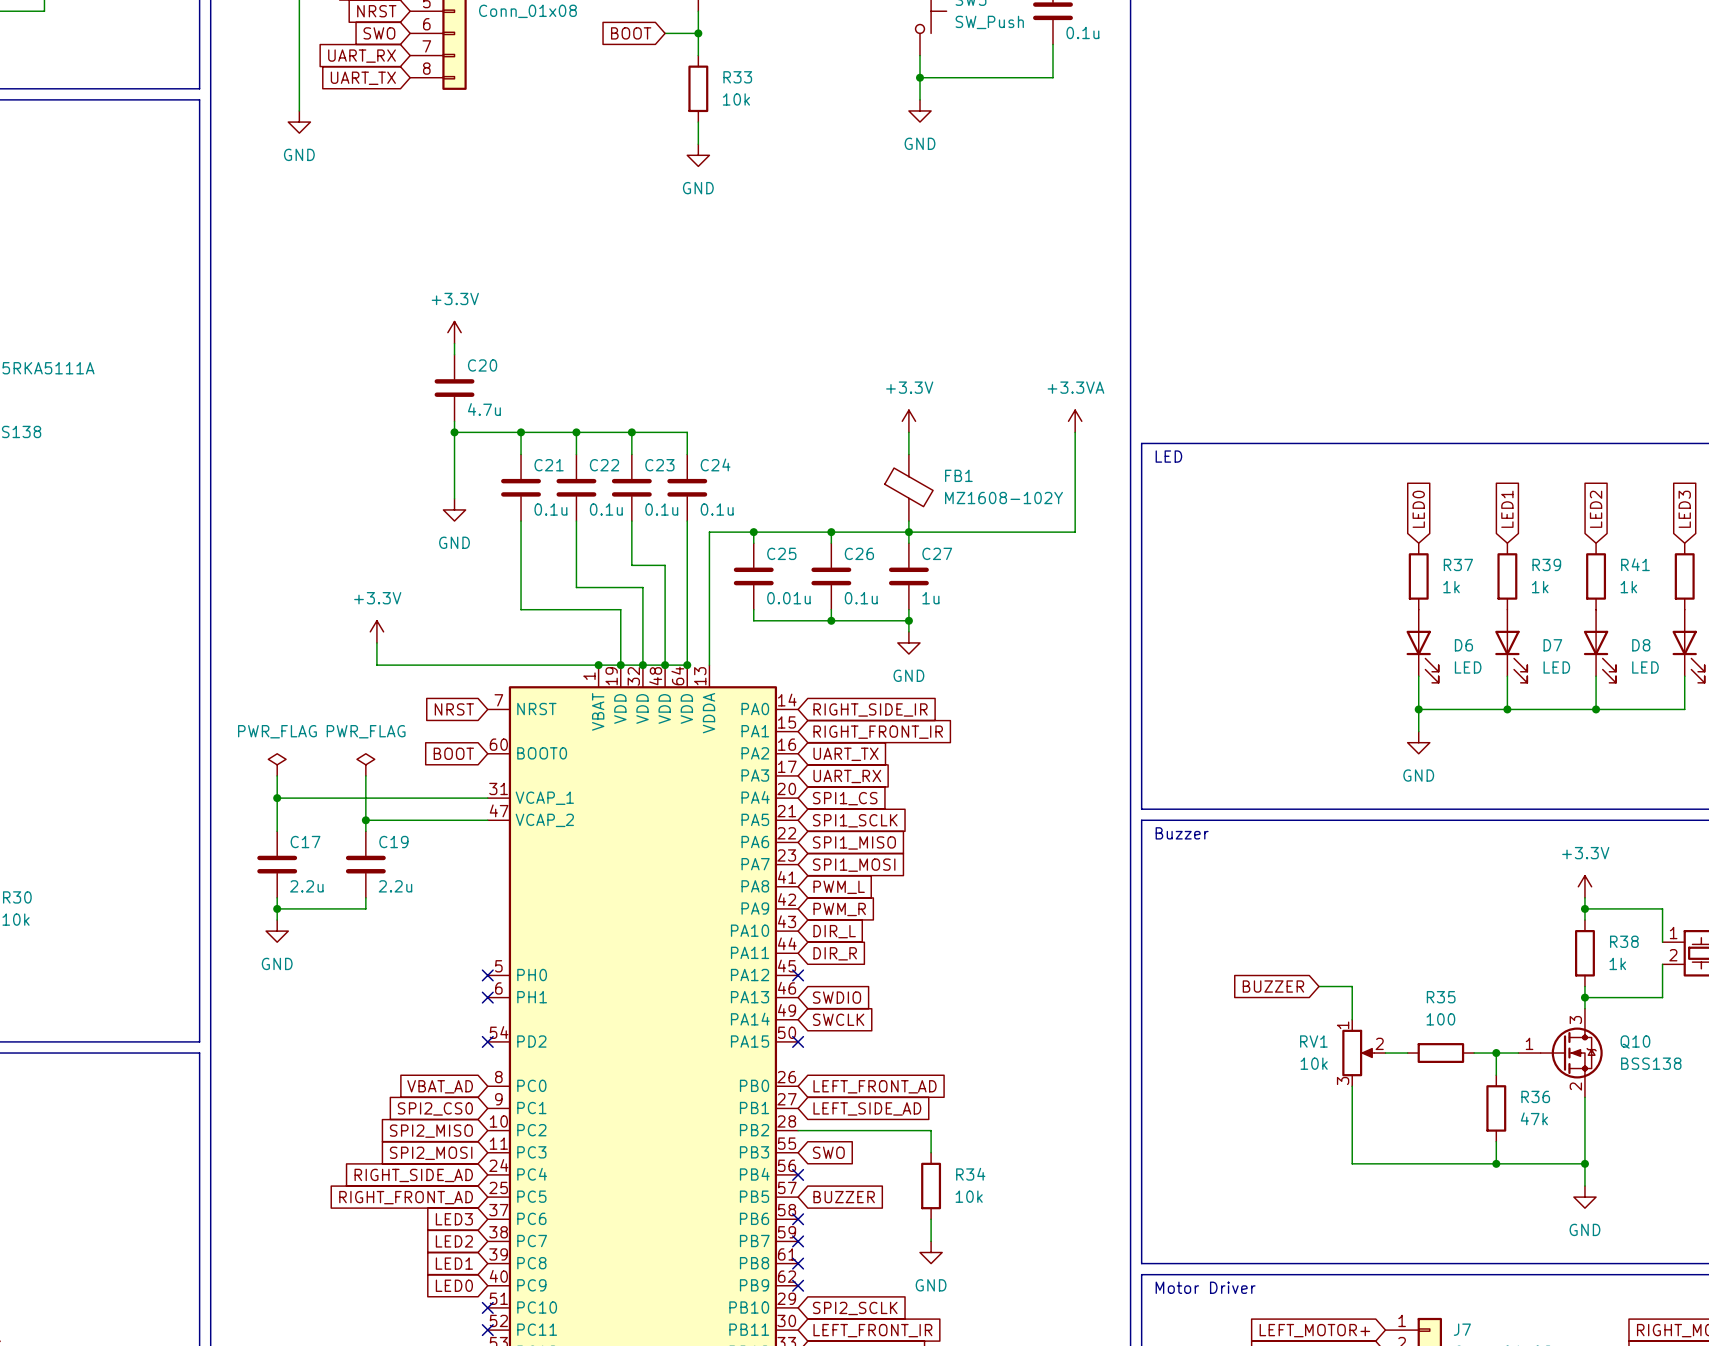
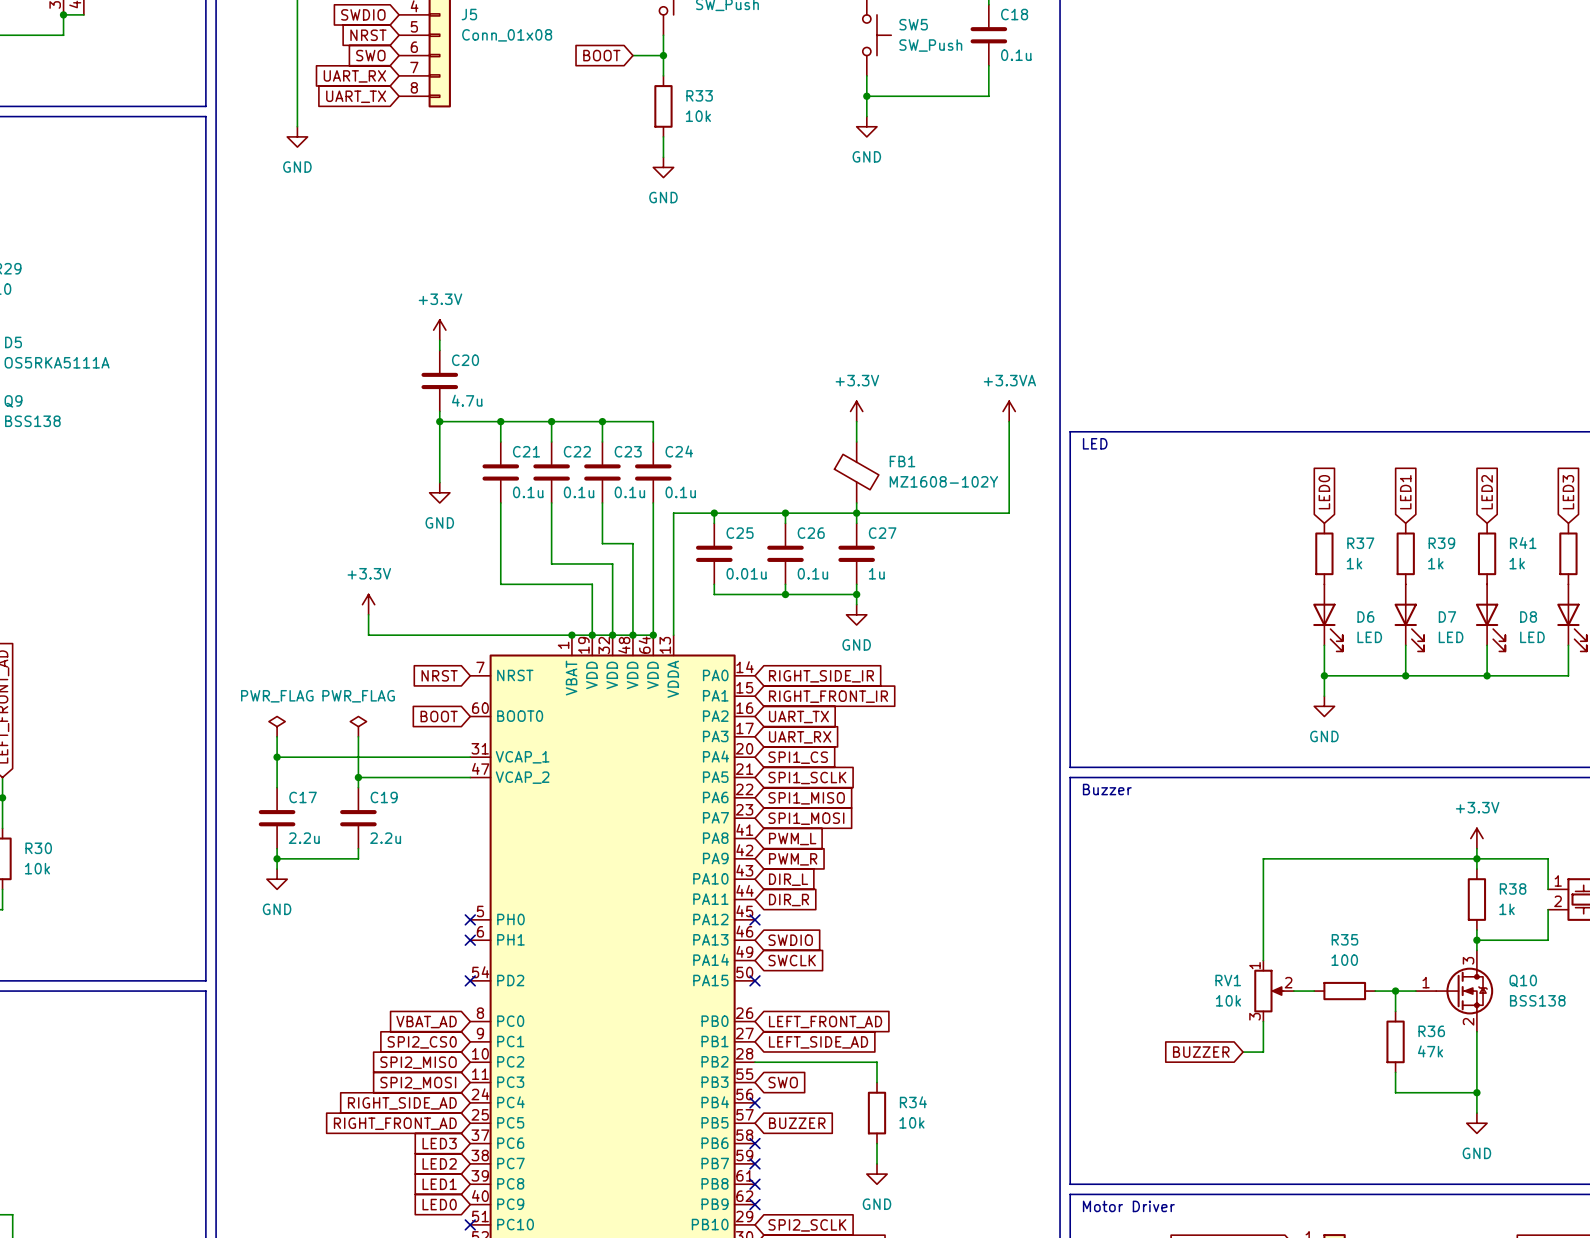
global label position: BUZZER (1273, 986) -> BUZZER (1201, 1052)
wire: (1318, 986) (1352, 986) -> (1476, 858) (1263, 858) (1263, 930)
wire: (1352, 1119) (1352, 1163) (1496, 1163) -> (1263, 1052) (1243, 1052)
junction: (1496, 1163) -> none

